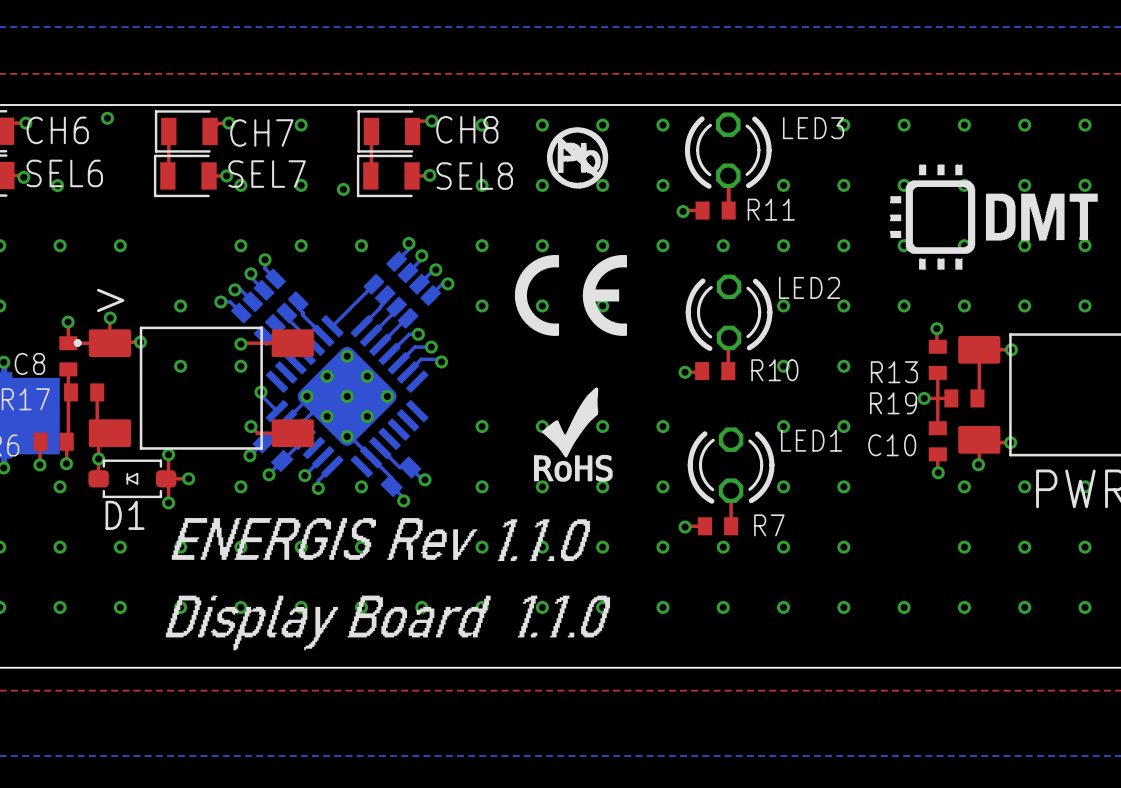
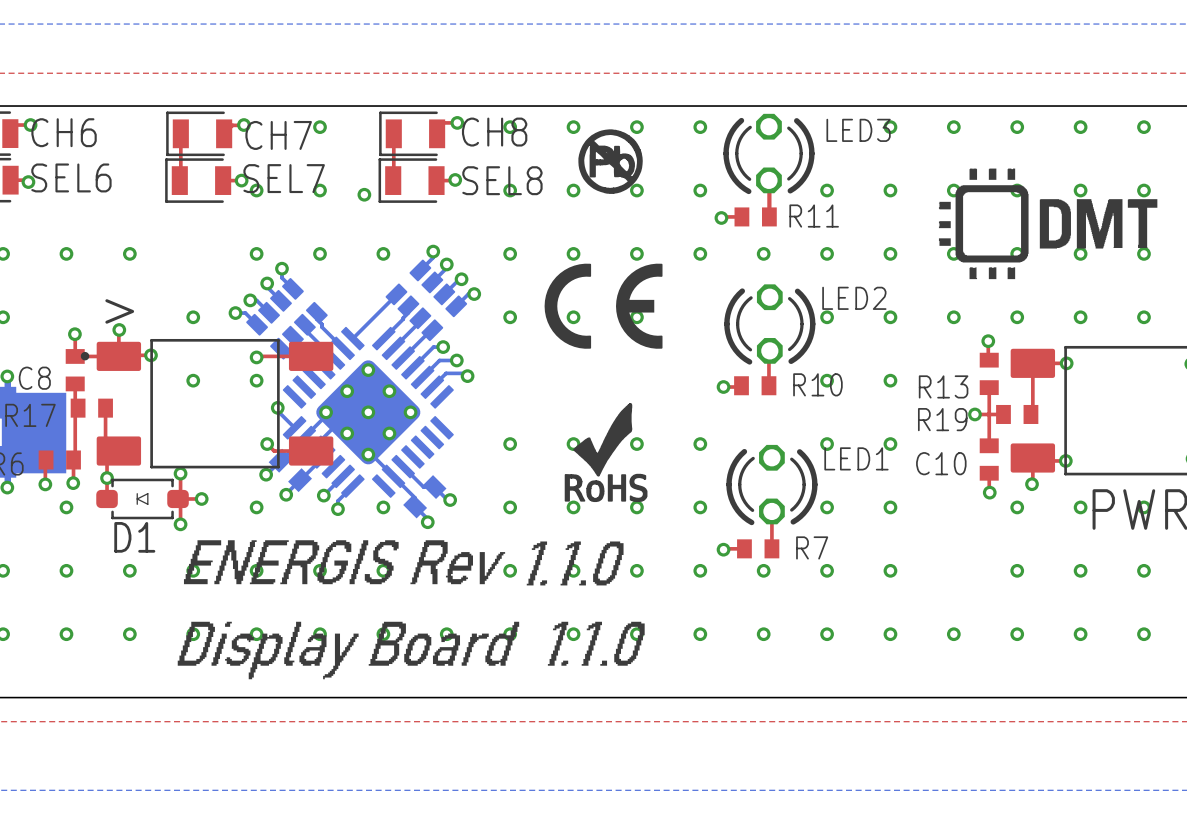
via: (107, 118) -> none
via: (57, 185) -> none

